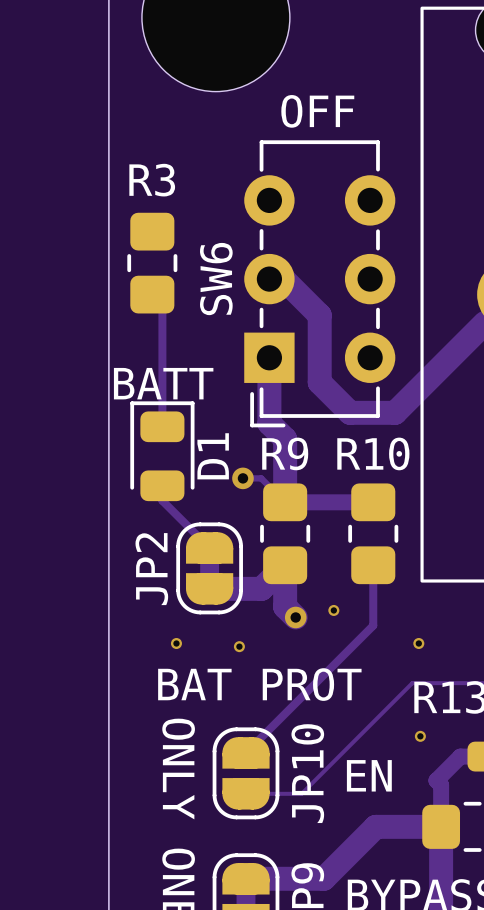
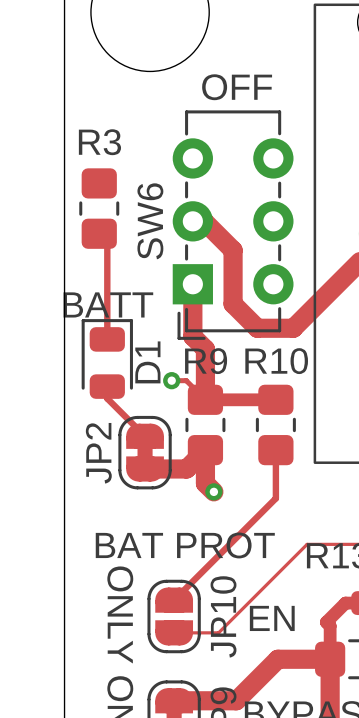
via: (333, 610) -> none
via: (176, 643) -> none
via: (418, 643) -> none
via: (239, 646) -> none
via: (420, 736) -> none

